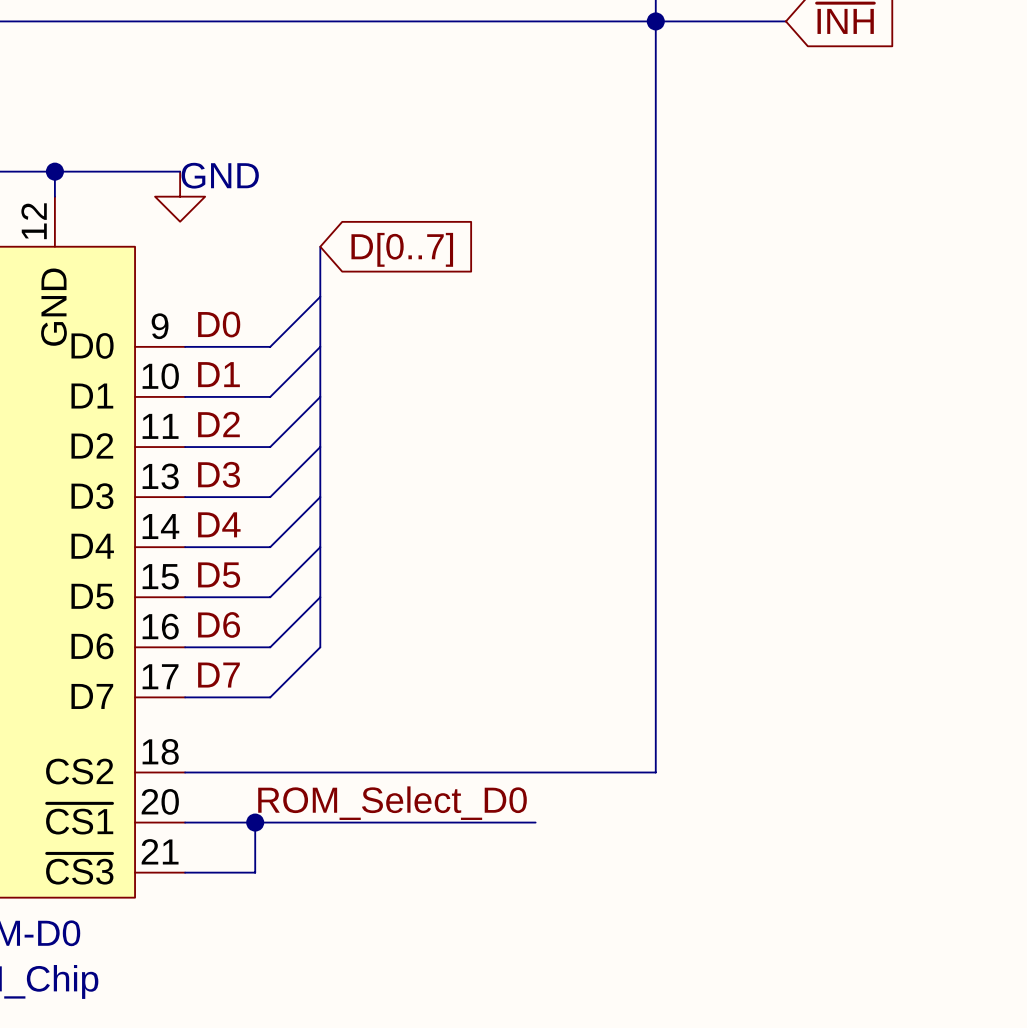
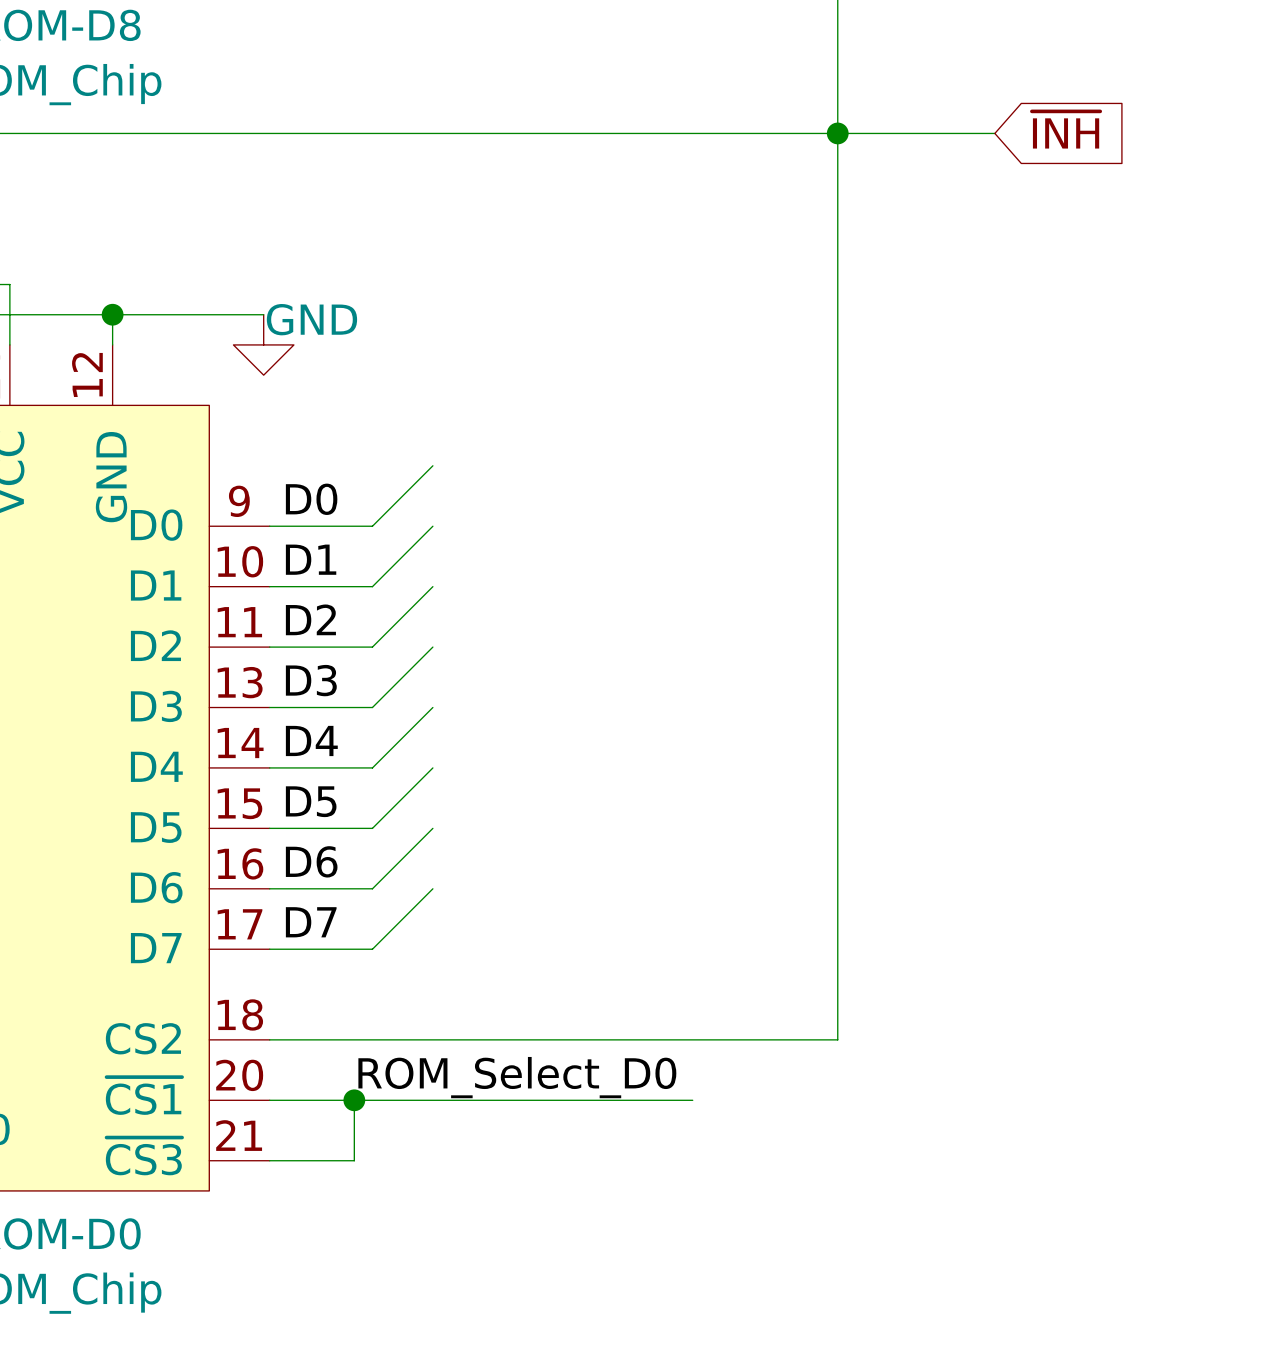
bus: (320, 246) (320, 647) -> none
global label: D[0..7] (402, 249) -> none

